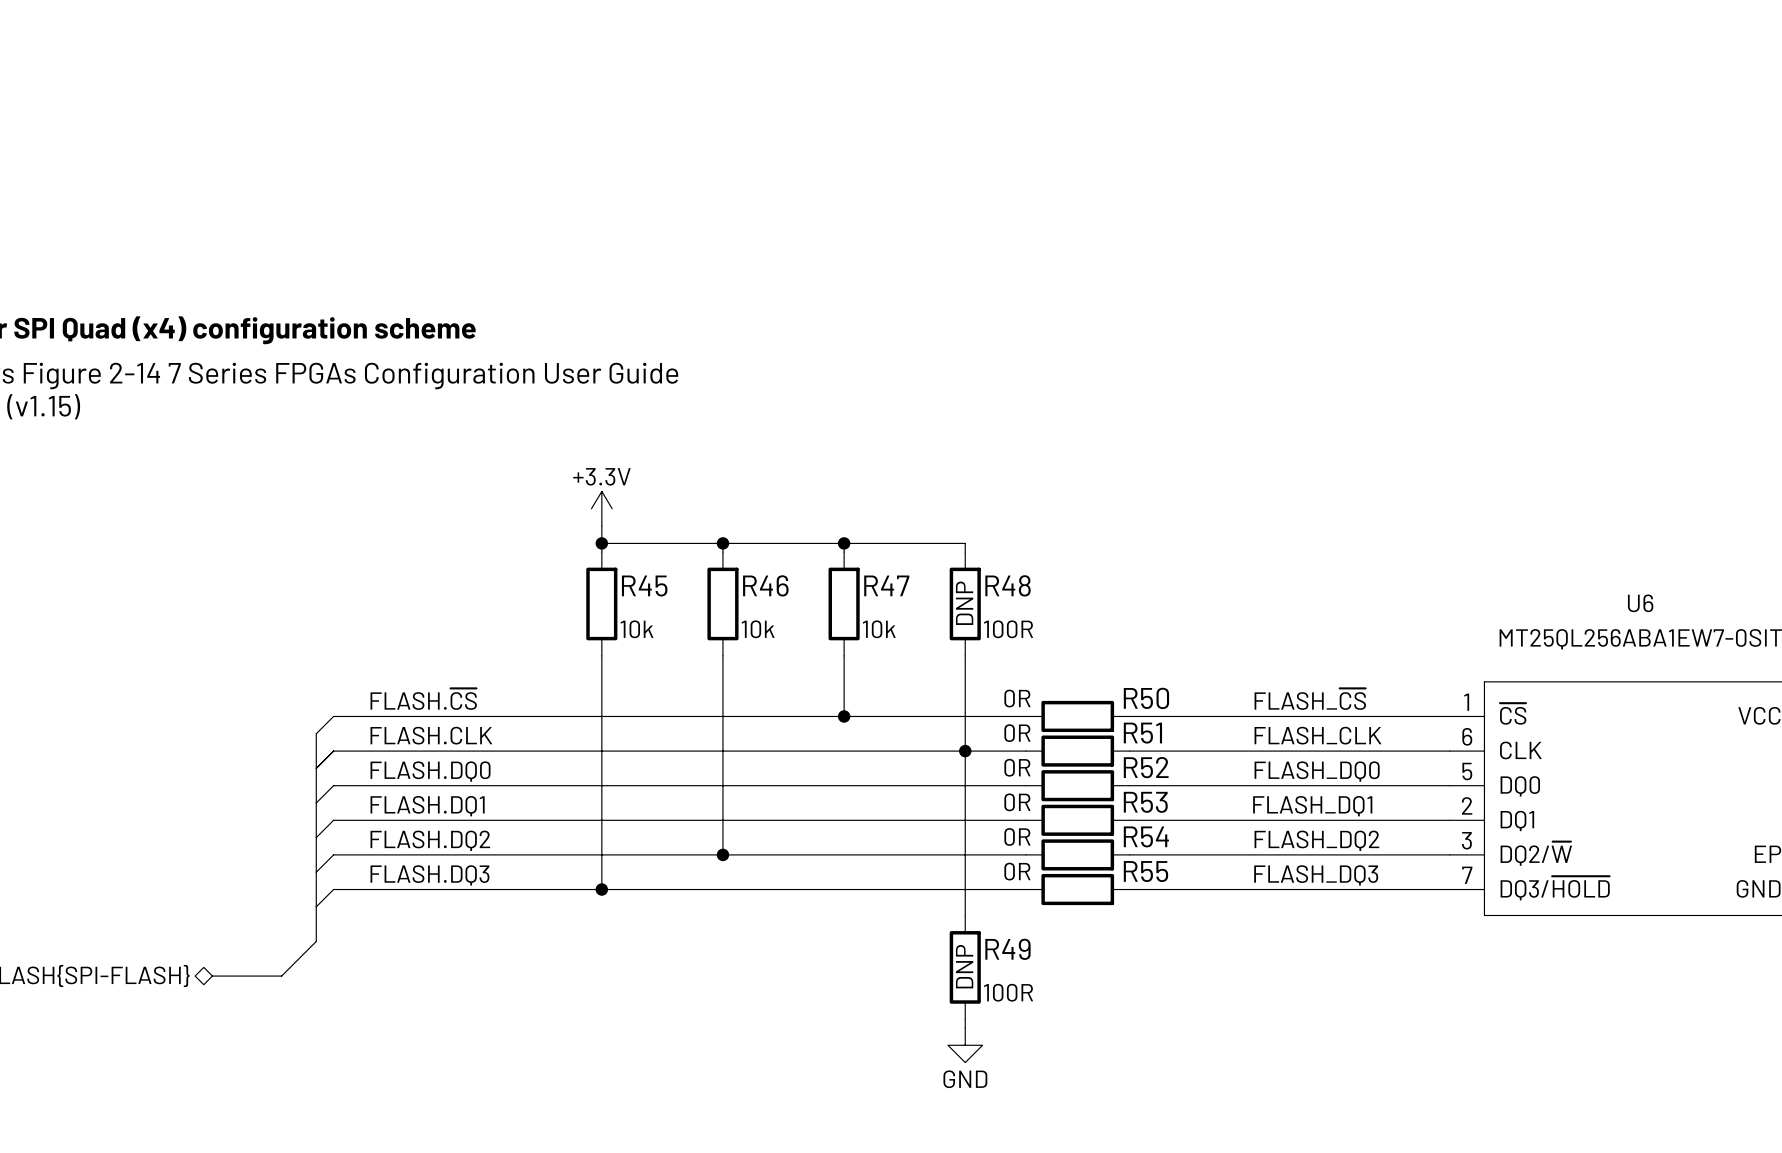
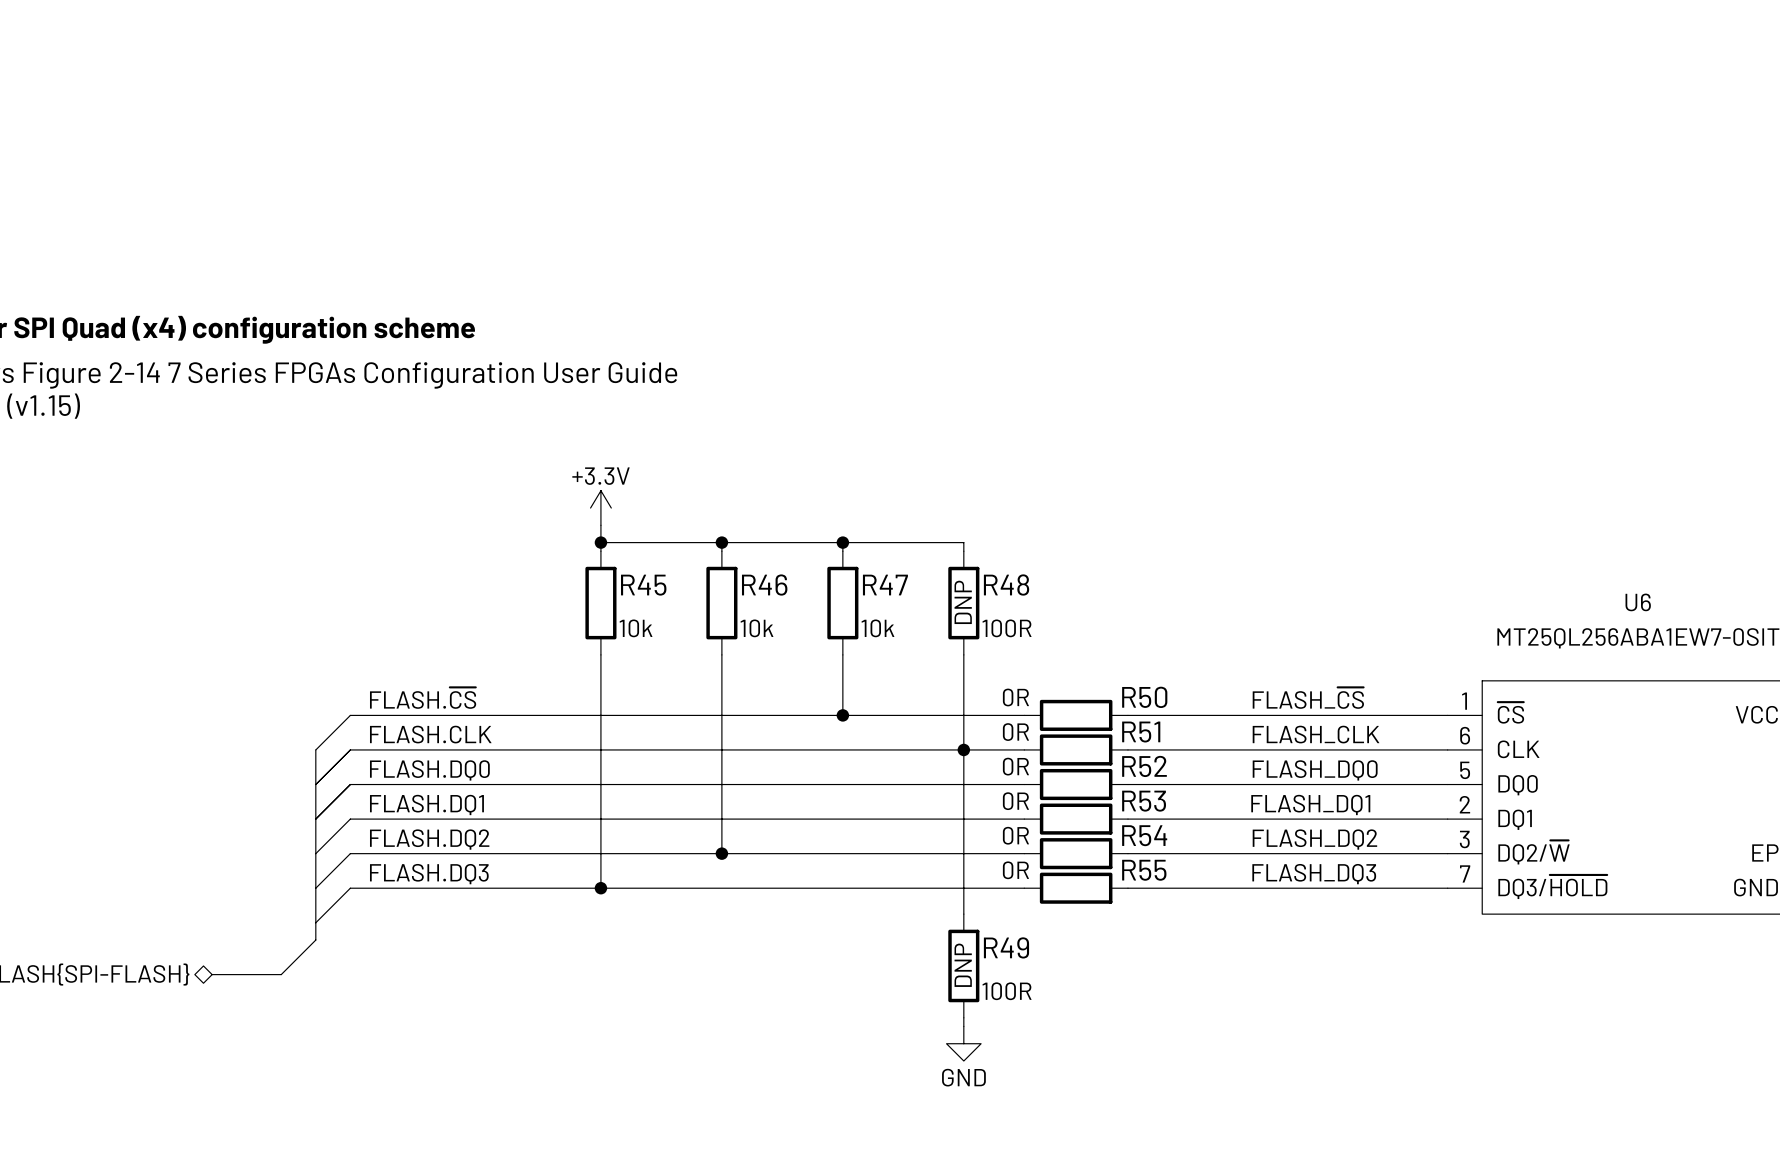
wire: (333, 716) (350, 716) -> (315, 749) (350, 715)
wire: (333, 716) (316, 733) -> none
bus: (316, 733) (316, 751) -> none
wire: (333, 751) (350, 751) -> (315, 784) (350, 749)
wire: (333, 751) (316, 768) -> none
wire: (333, 785) (350, 785) -> (315, 819) (350, 784)
wire: (333, 785) (316, 803) -> none
wire: (333, 820) (350, 820) -> (315, 853) (350, 819)
wire: (333, 820) (316, 837) -> none
wire: (333, 854) (350, 854) -> (315, 888) (350, 853)
wire: (333, 854) (316, 872) -> none
wire: (333, 889) (350, 889) -> (315, 922) (350, 888)
wire: (333, 889) (316, 906) -> none

